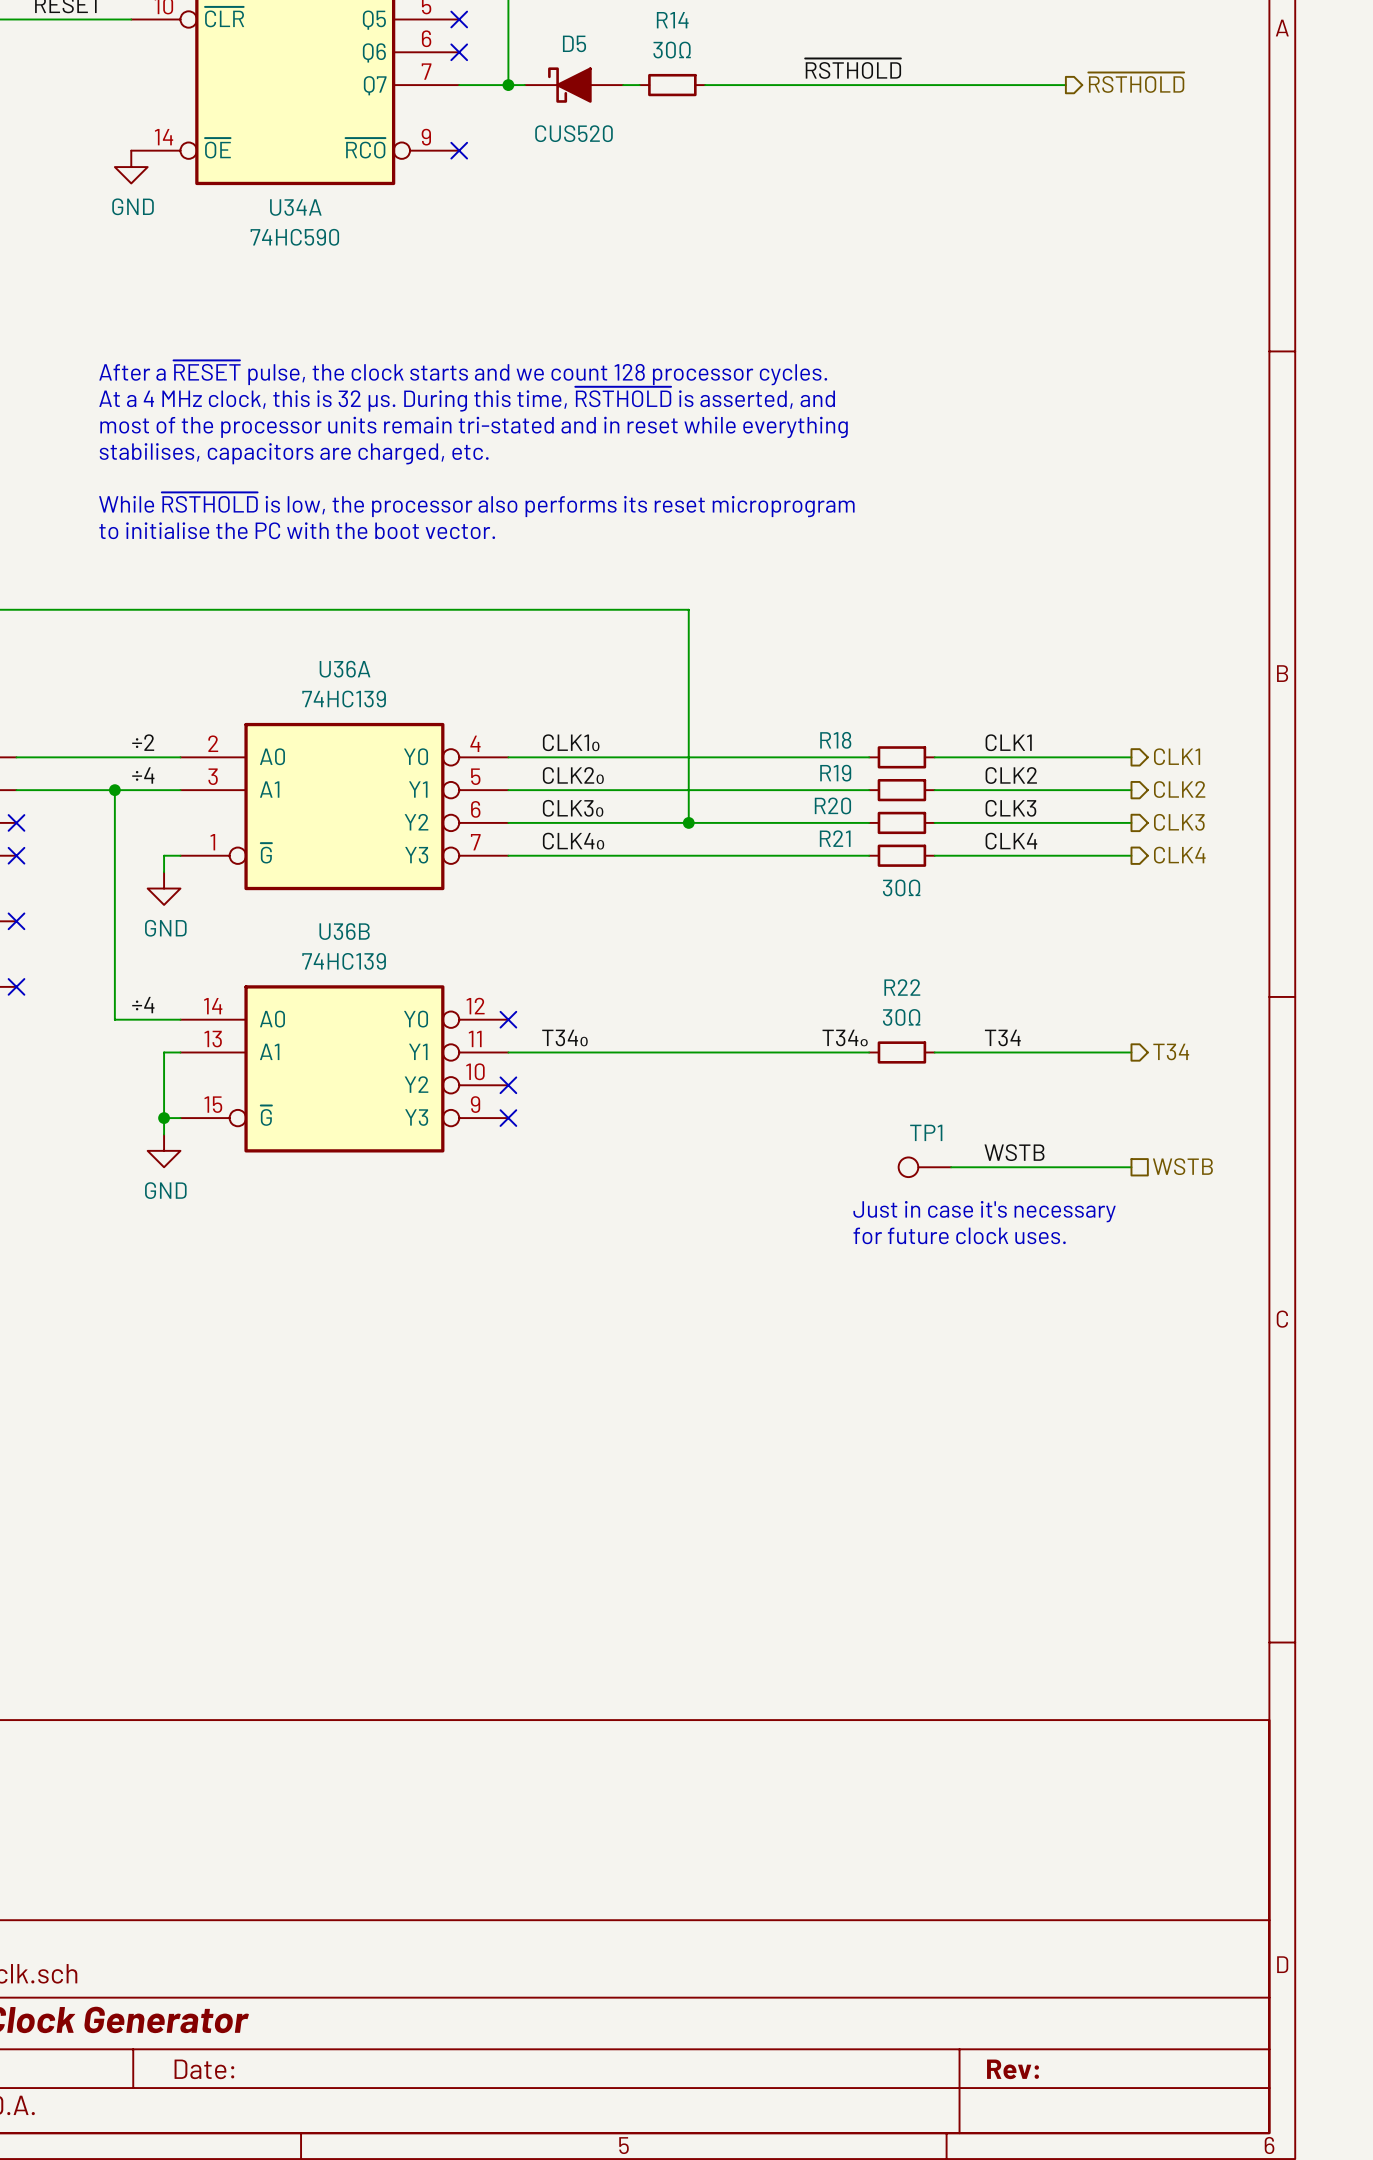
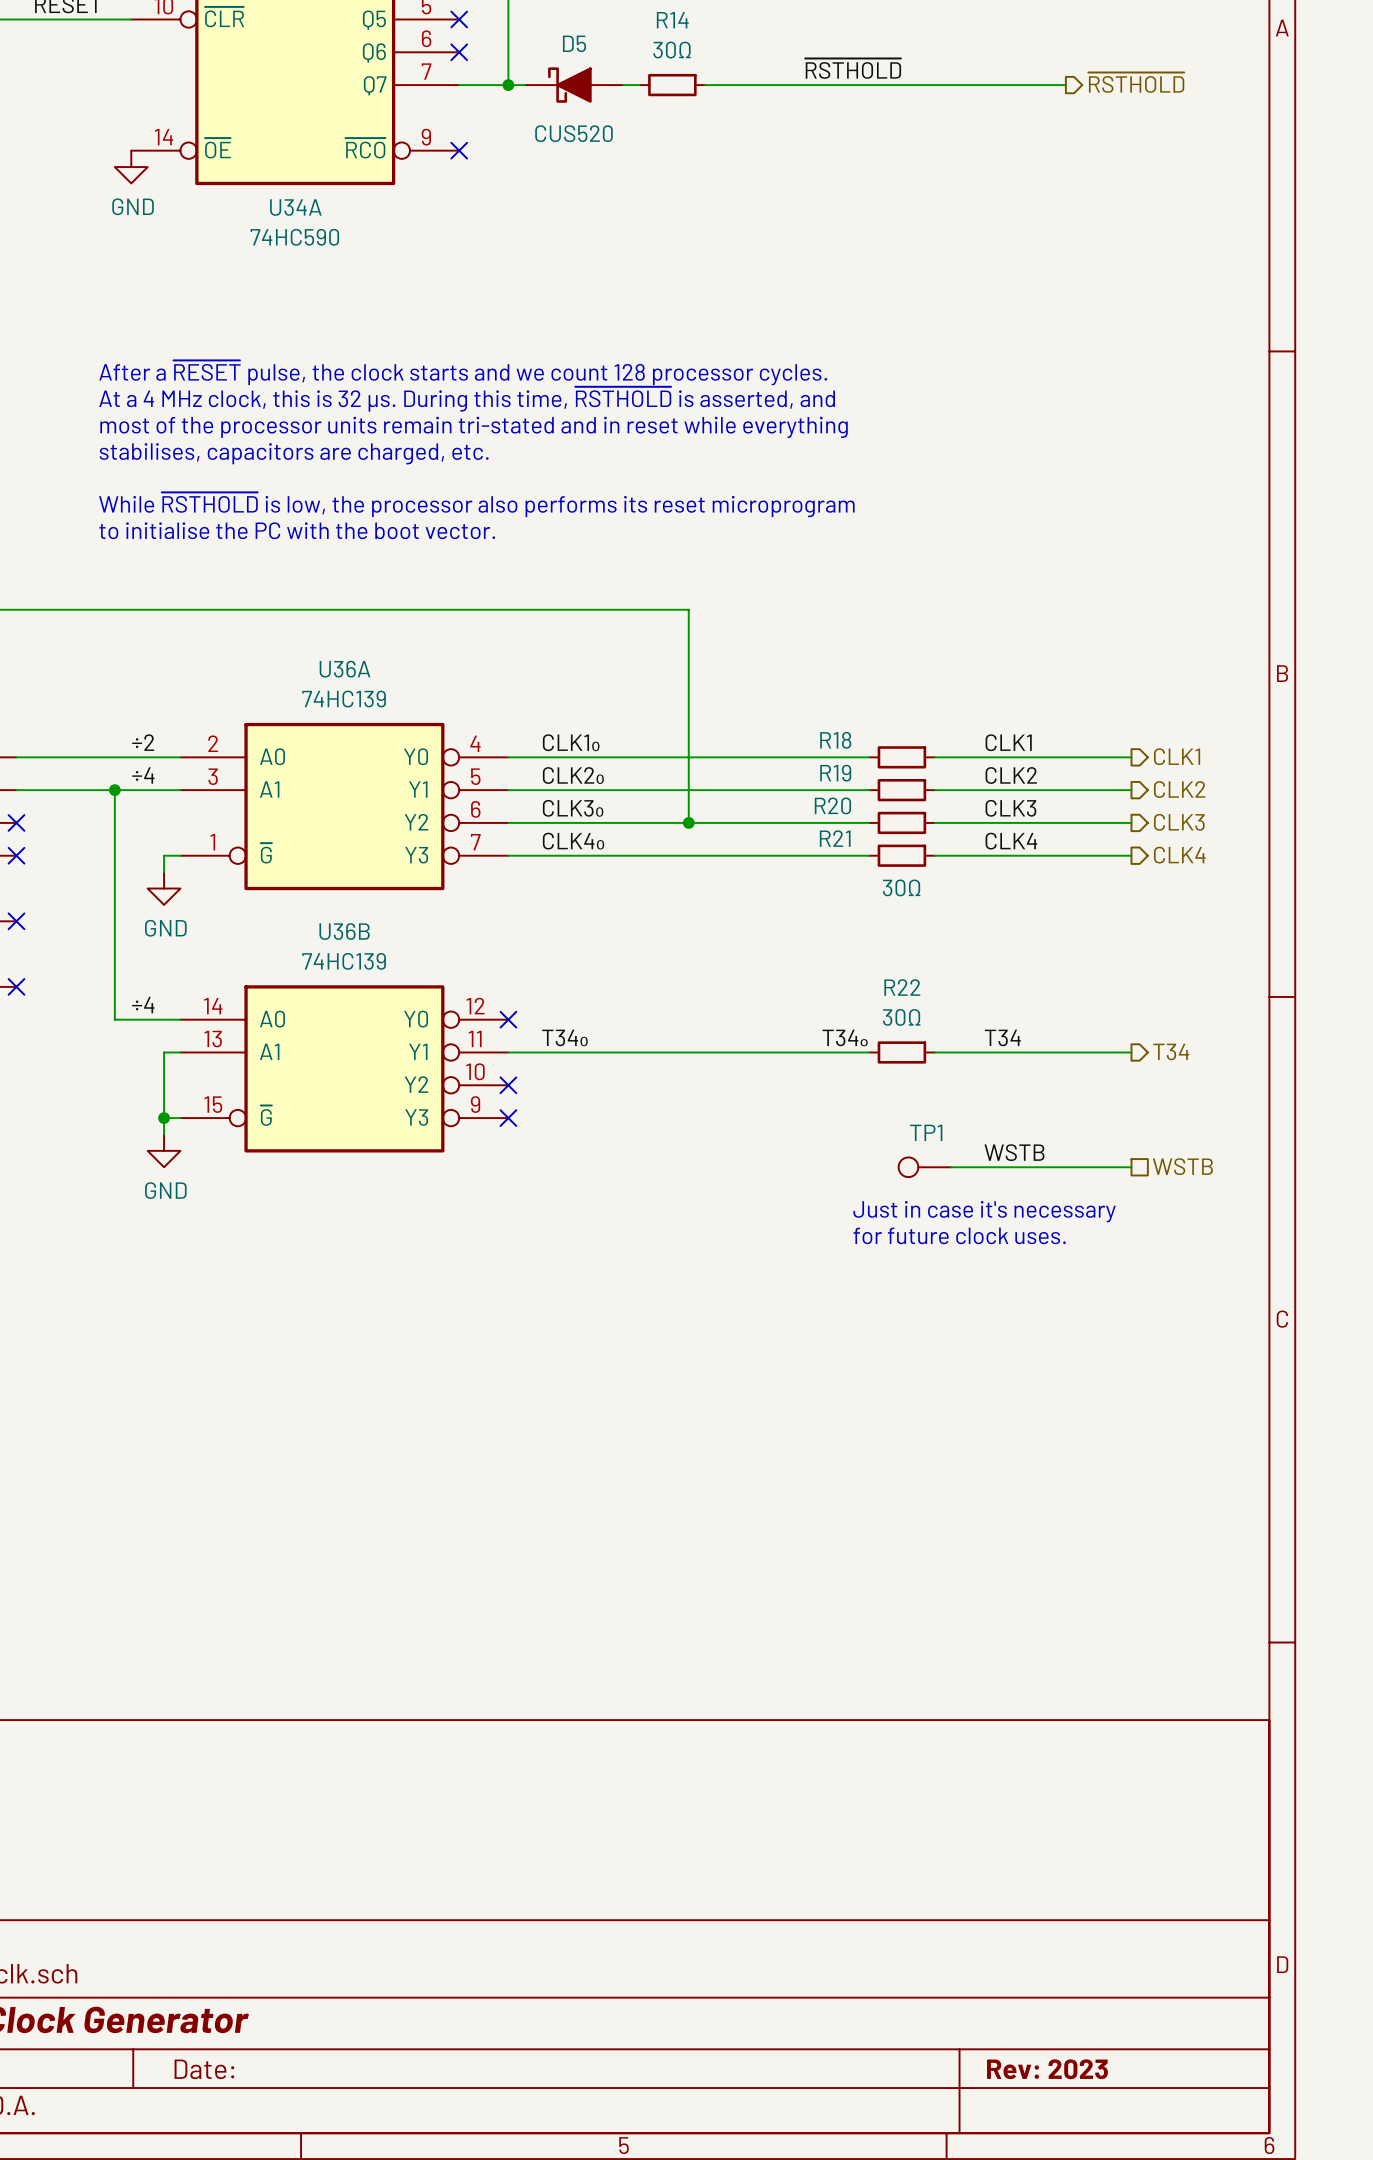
title block: Rev: (1013, 2069) -> Rev: 2023 (1047, 2069)

